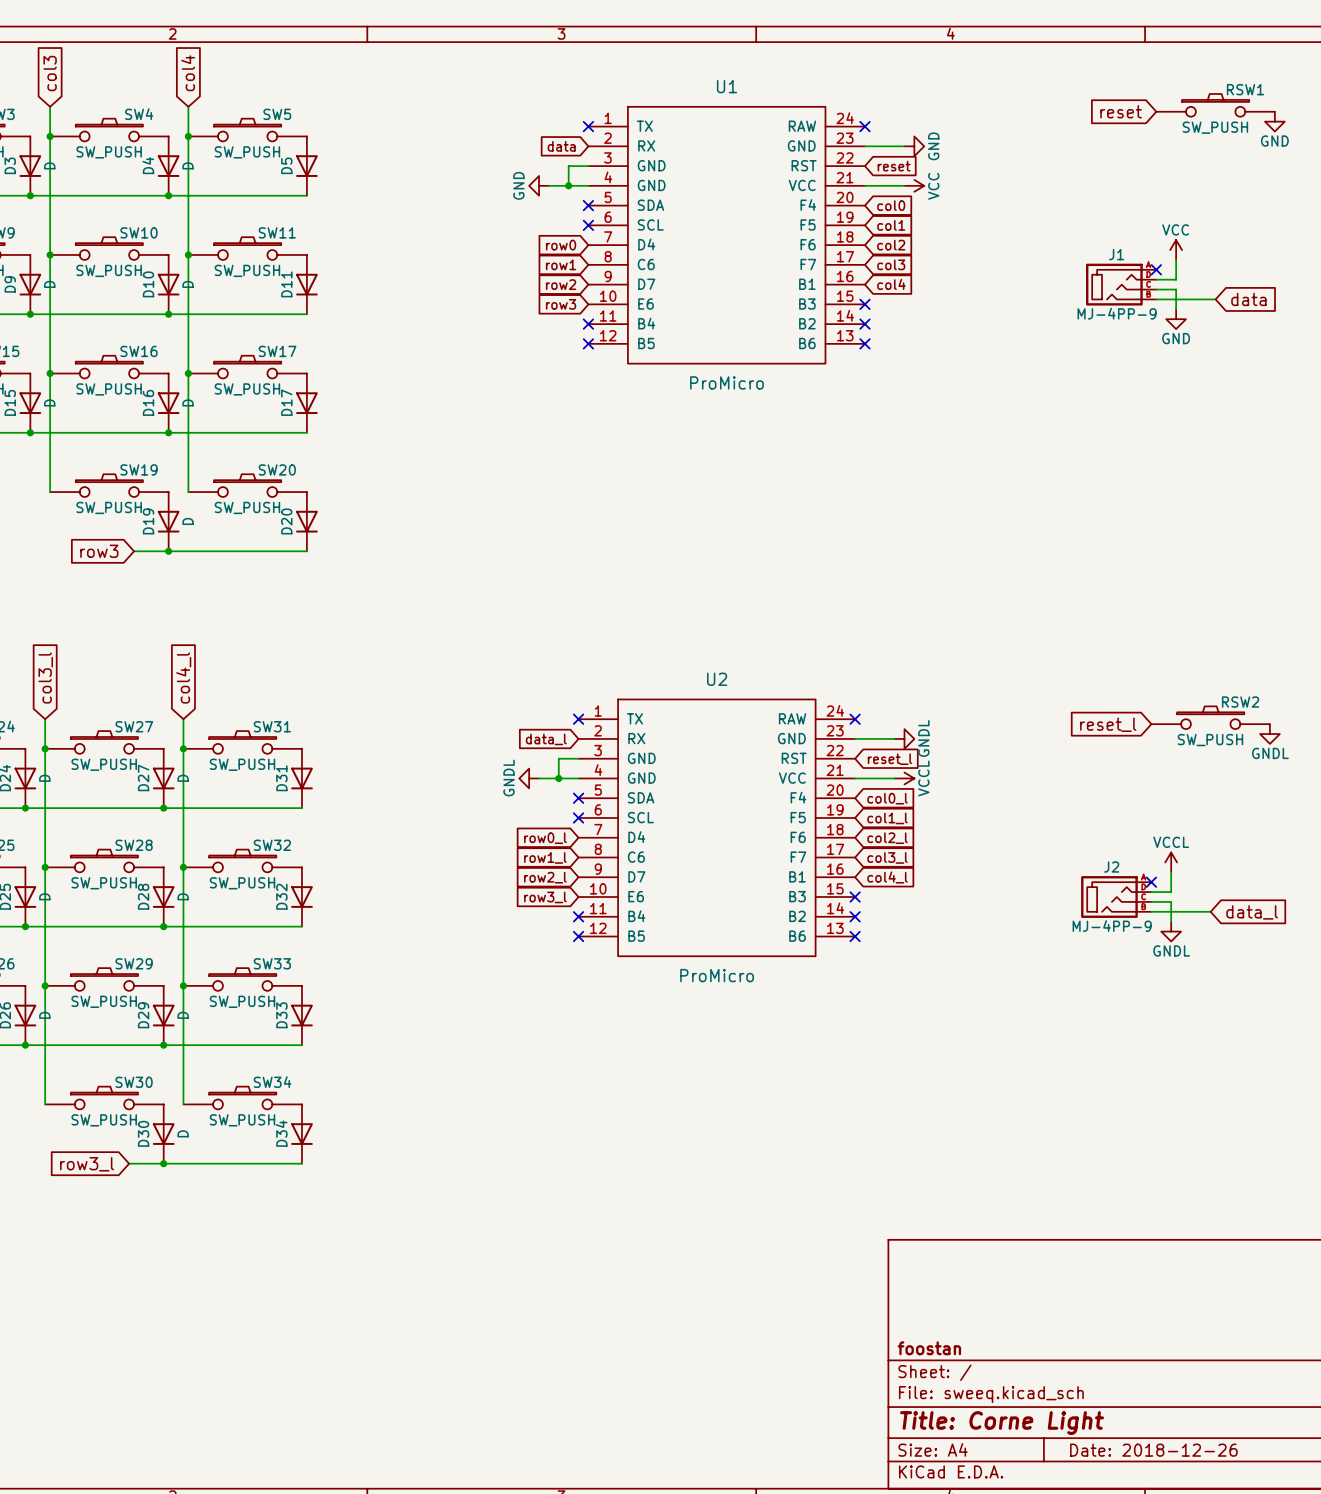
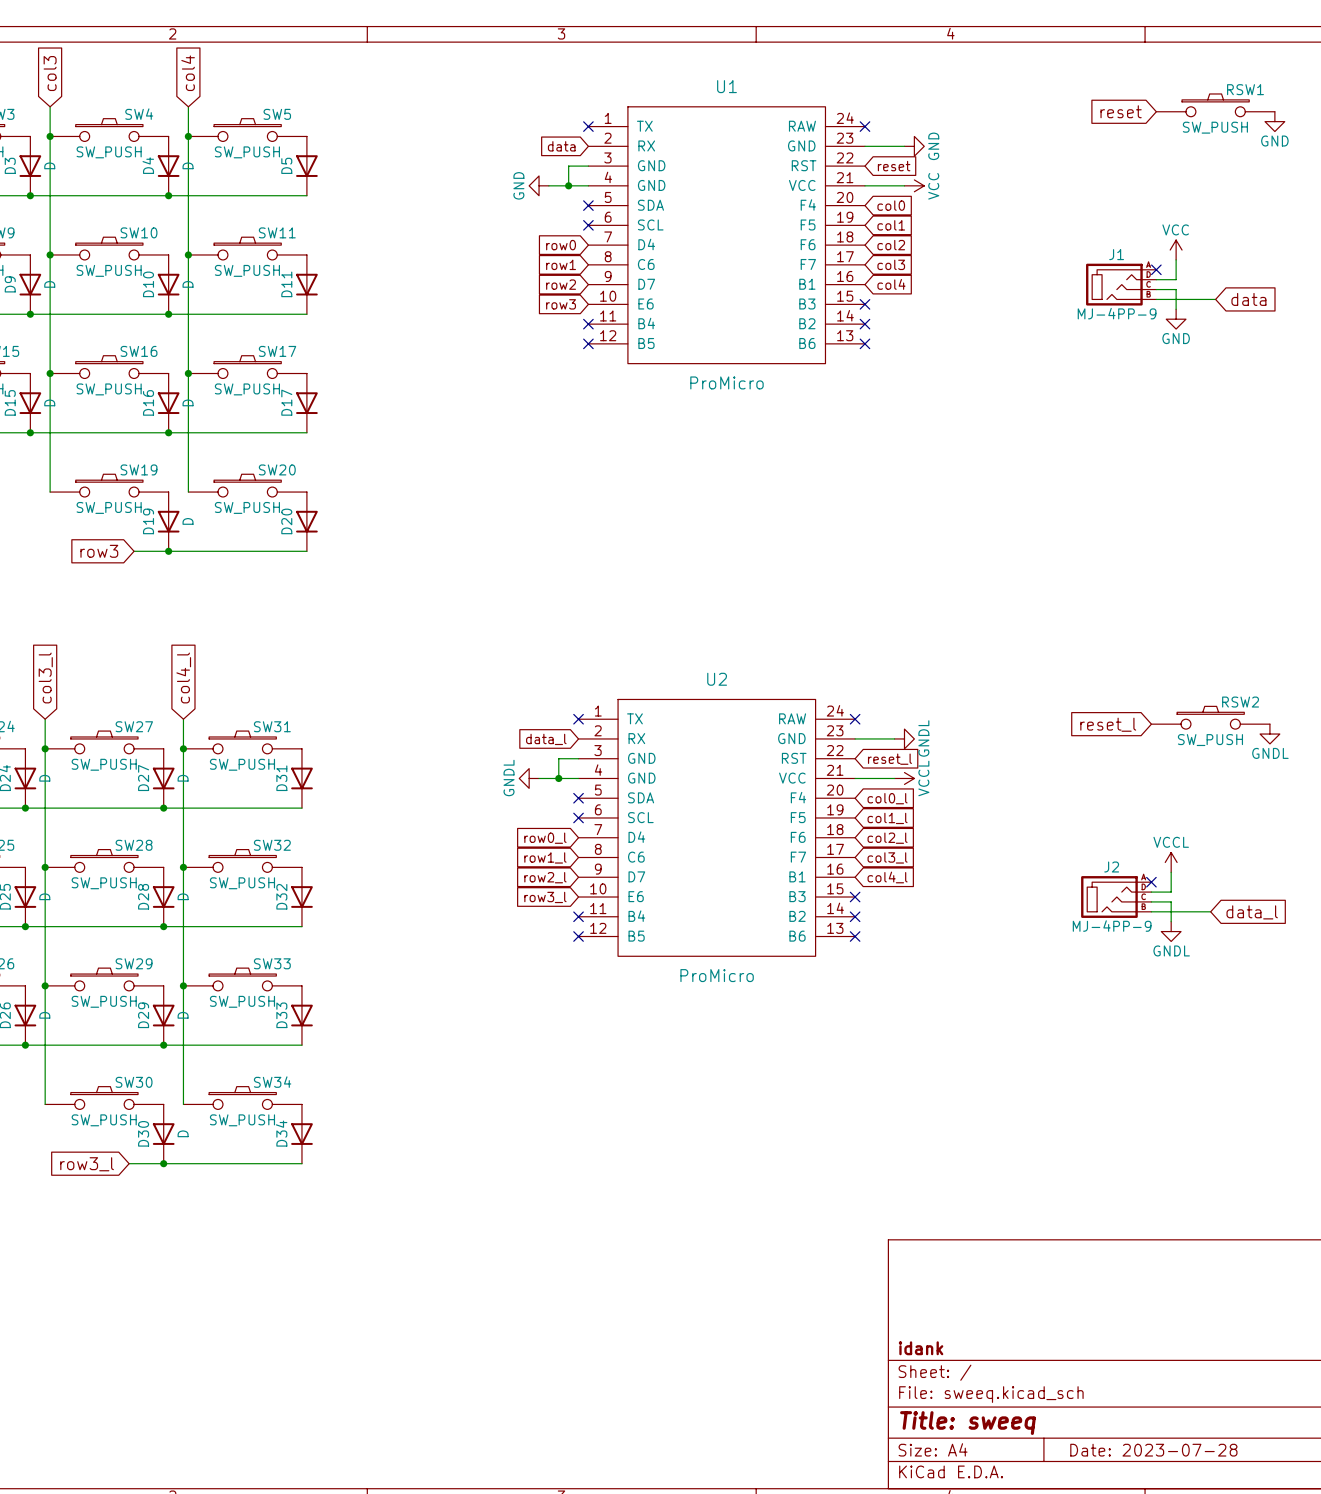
title block: foostan (929, 1348) -> idank (921, 1348)
title block: Title: Corne Light (1002, 1423) -> Title: sweeq (967, 1423)
title block: Date: 2018-12-26 (1153, 1450) -> Date: 2023-07-28 (1153, 1450)

